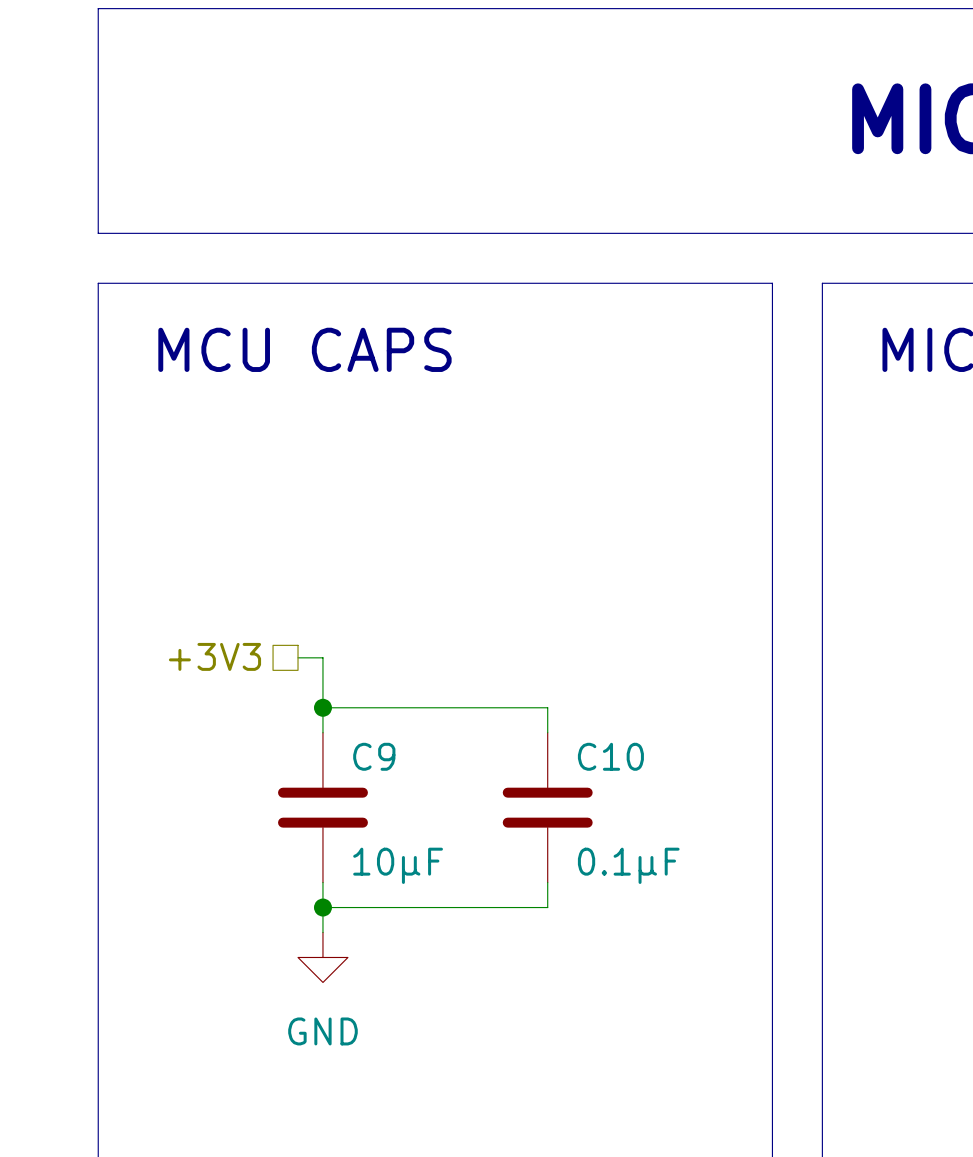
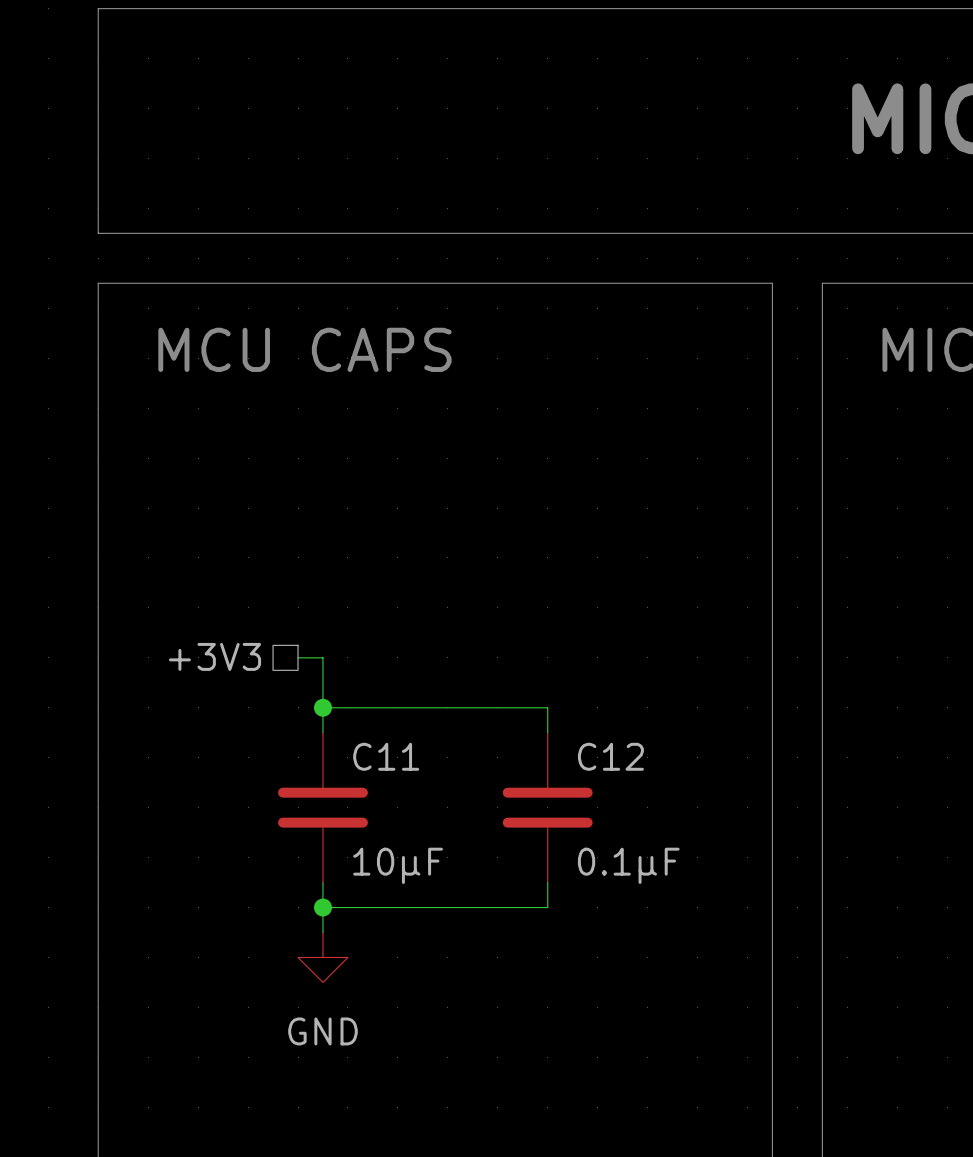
C9 name: C9 (374, 756) -> C11 (386, 756)
C10 name: C10 (610, 756) -> C12 (610, 756)

